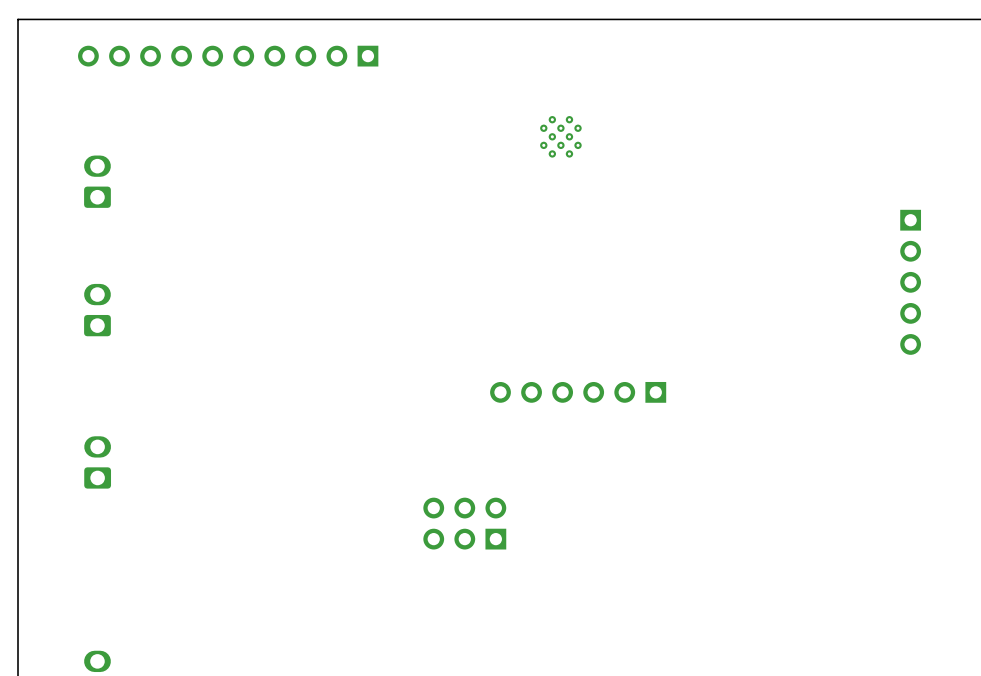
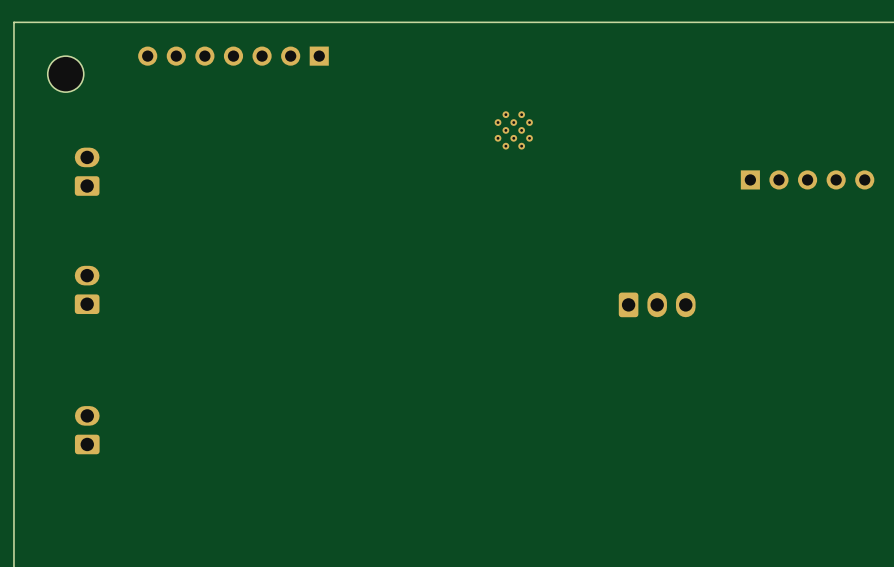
part: (228, 56) -> none
part: none -> (233, 56)
part: none -> (65, 74)
part rotation: 0° (910, 282) -> 90° counterclockwise (807, 179)
part position: (910, 282) -> (807, 179)
part: none -> (657, 304)
part: (578, 392) -> none
part: (464, 523) -> none

